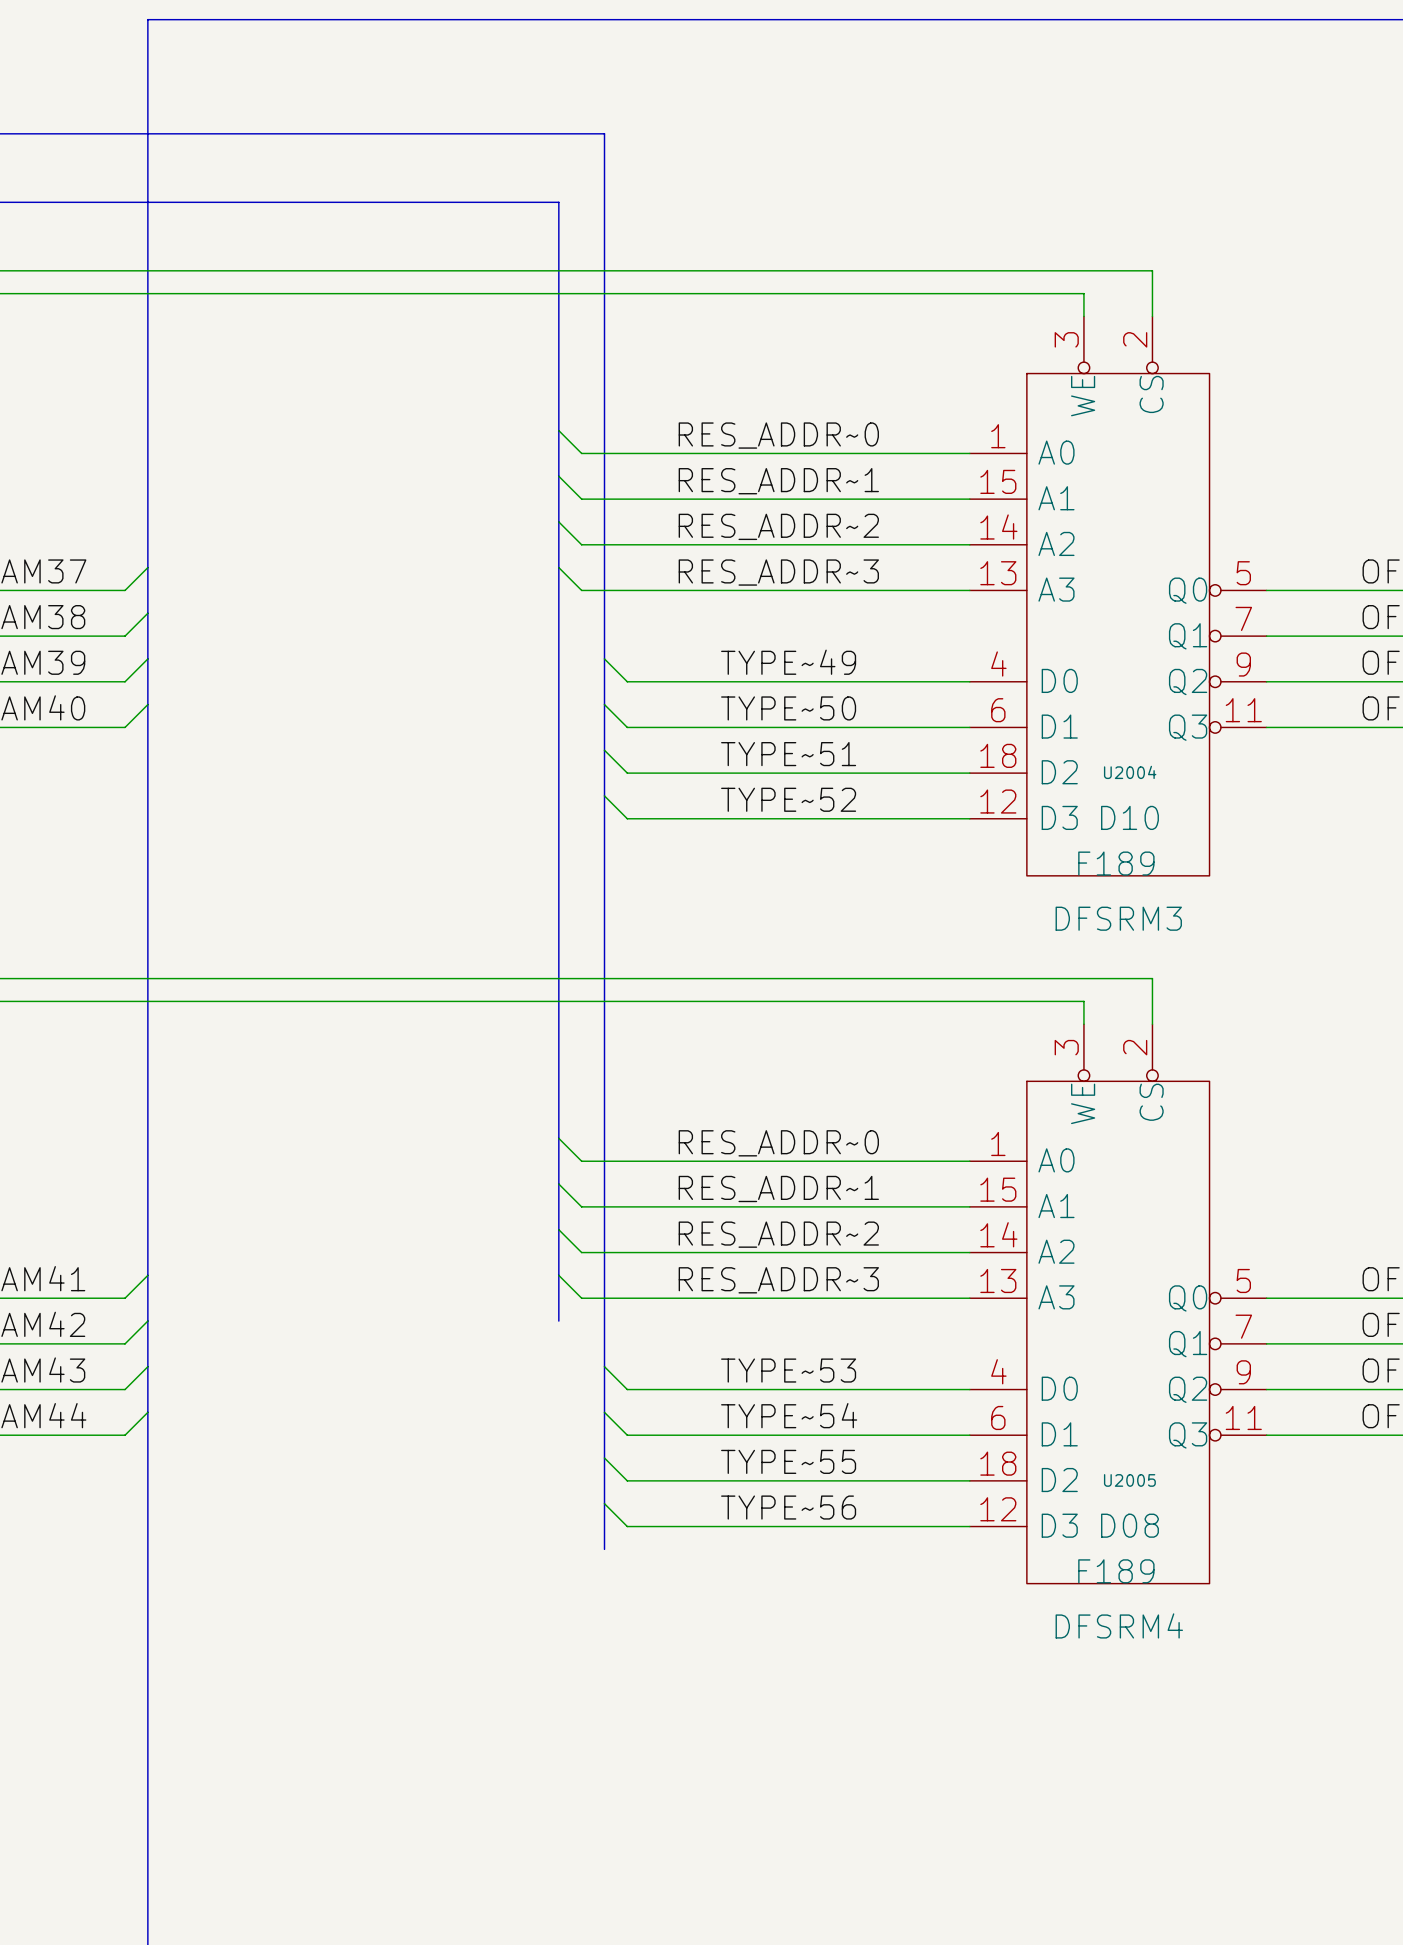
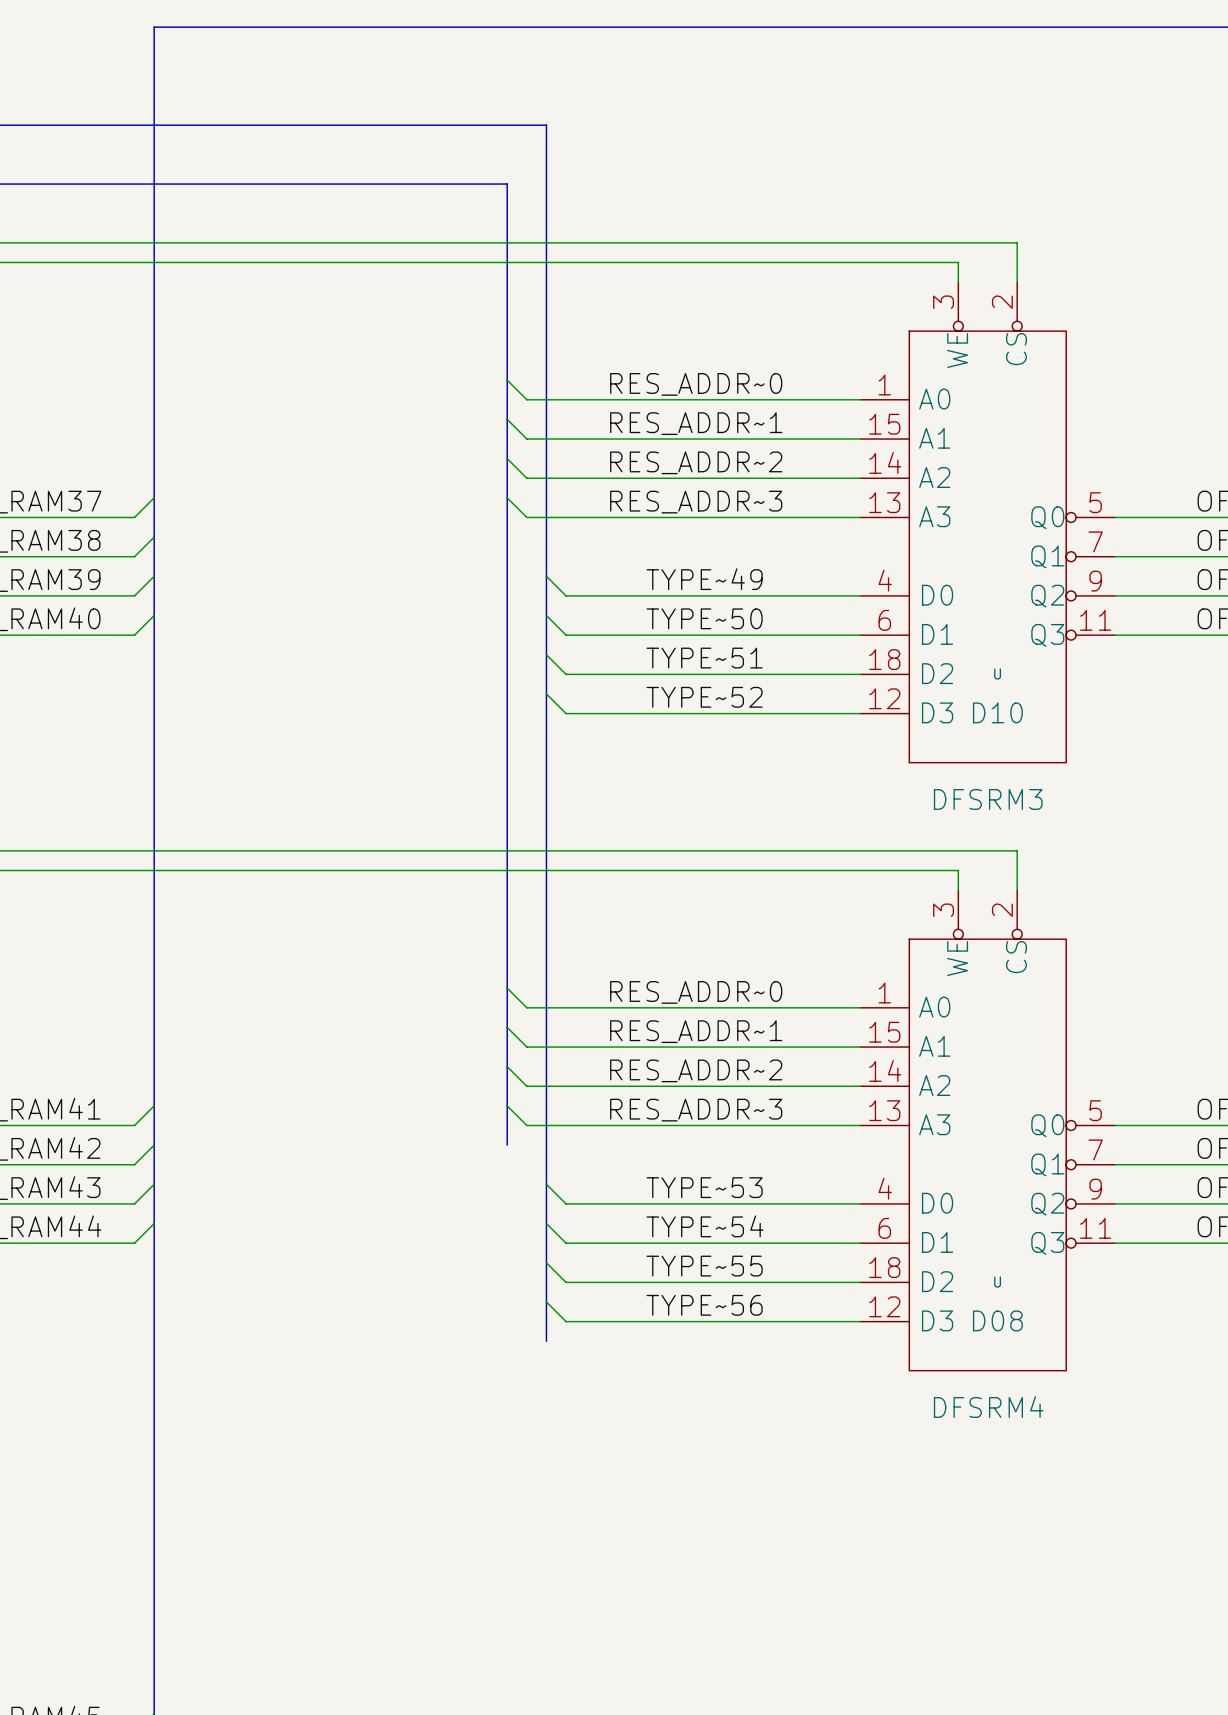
U2004 name: U2004 (1130, 772) -> U (997, 674)
U2004 value: F189 (1116, 863) -> none
U2005 name: U2005 (1129, 1480) -> U (997, 1282)
U2005 value: F189 (1116, 1571) -> none

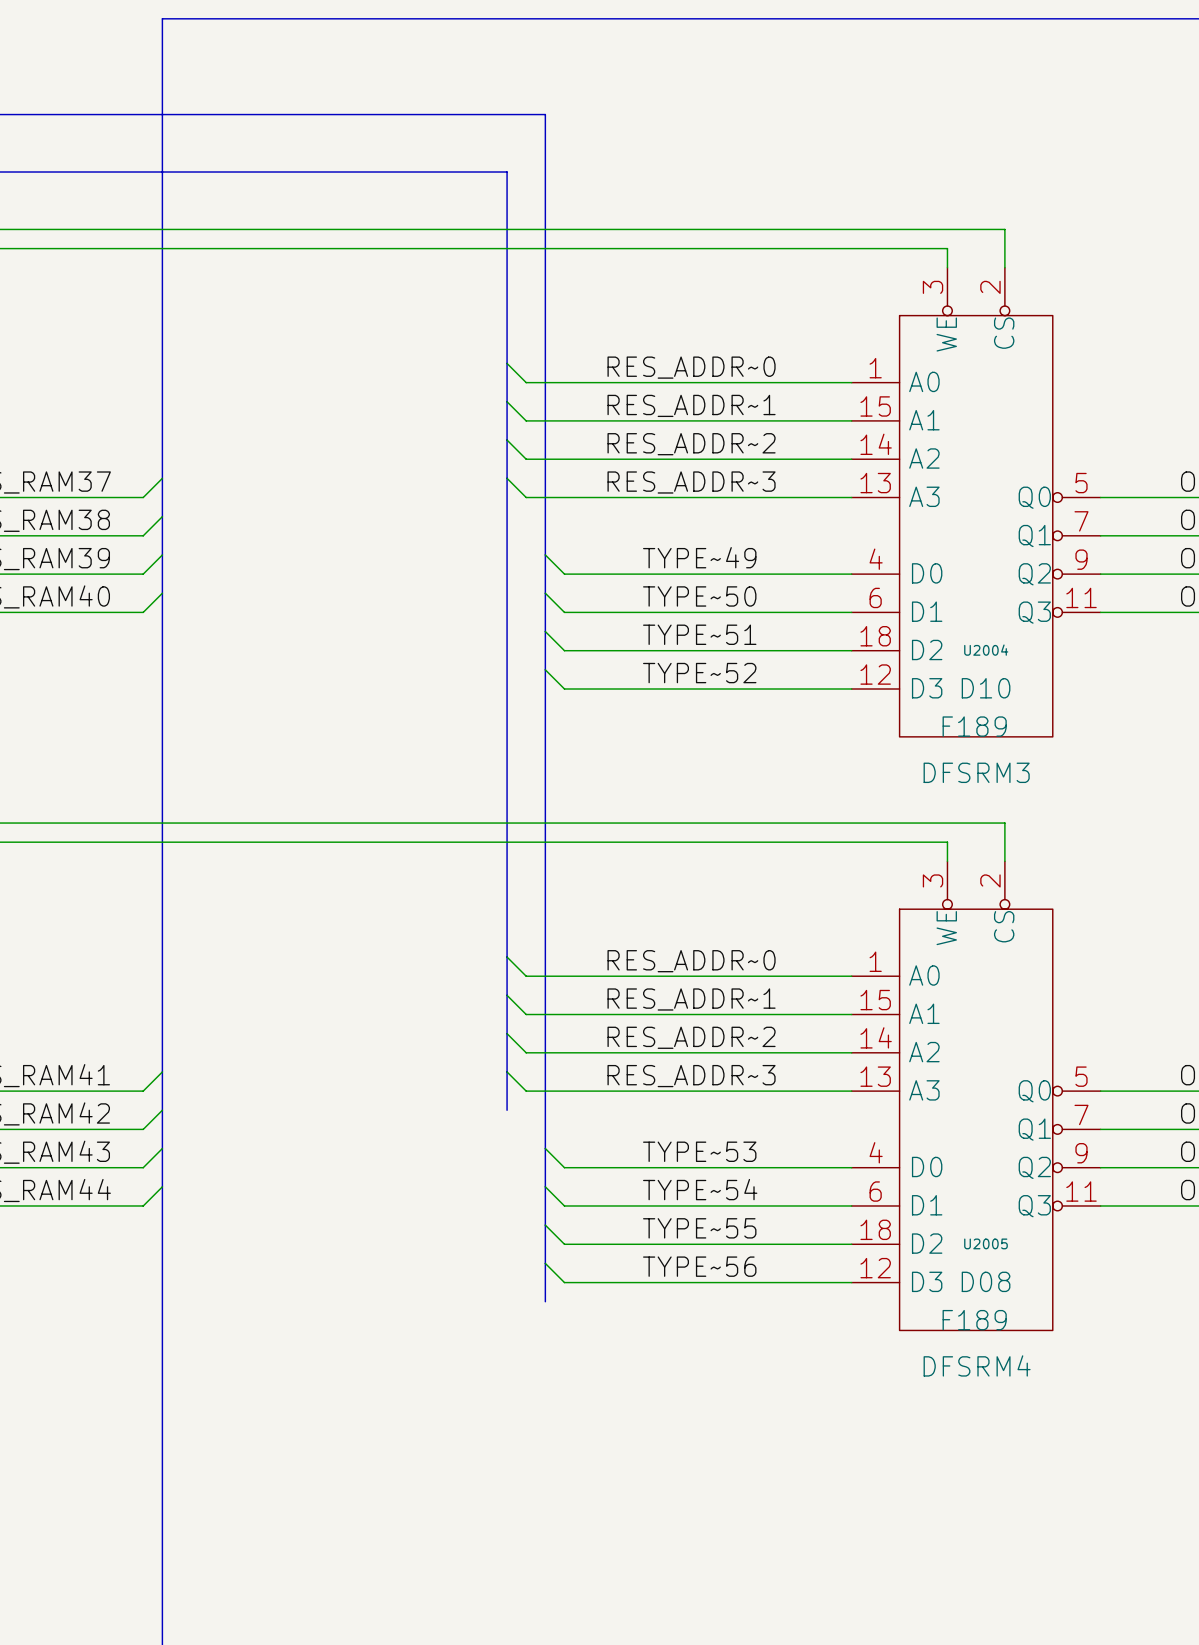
U name: U (997, 674) -> U2004 (986, 650)
U value: none -> F189 (974, 726)
U name: U (997, 1282) -> U2005 (985, 1243)
U value: none -> F189 (974, 1320)

